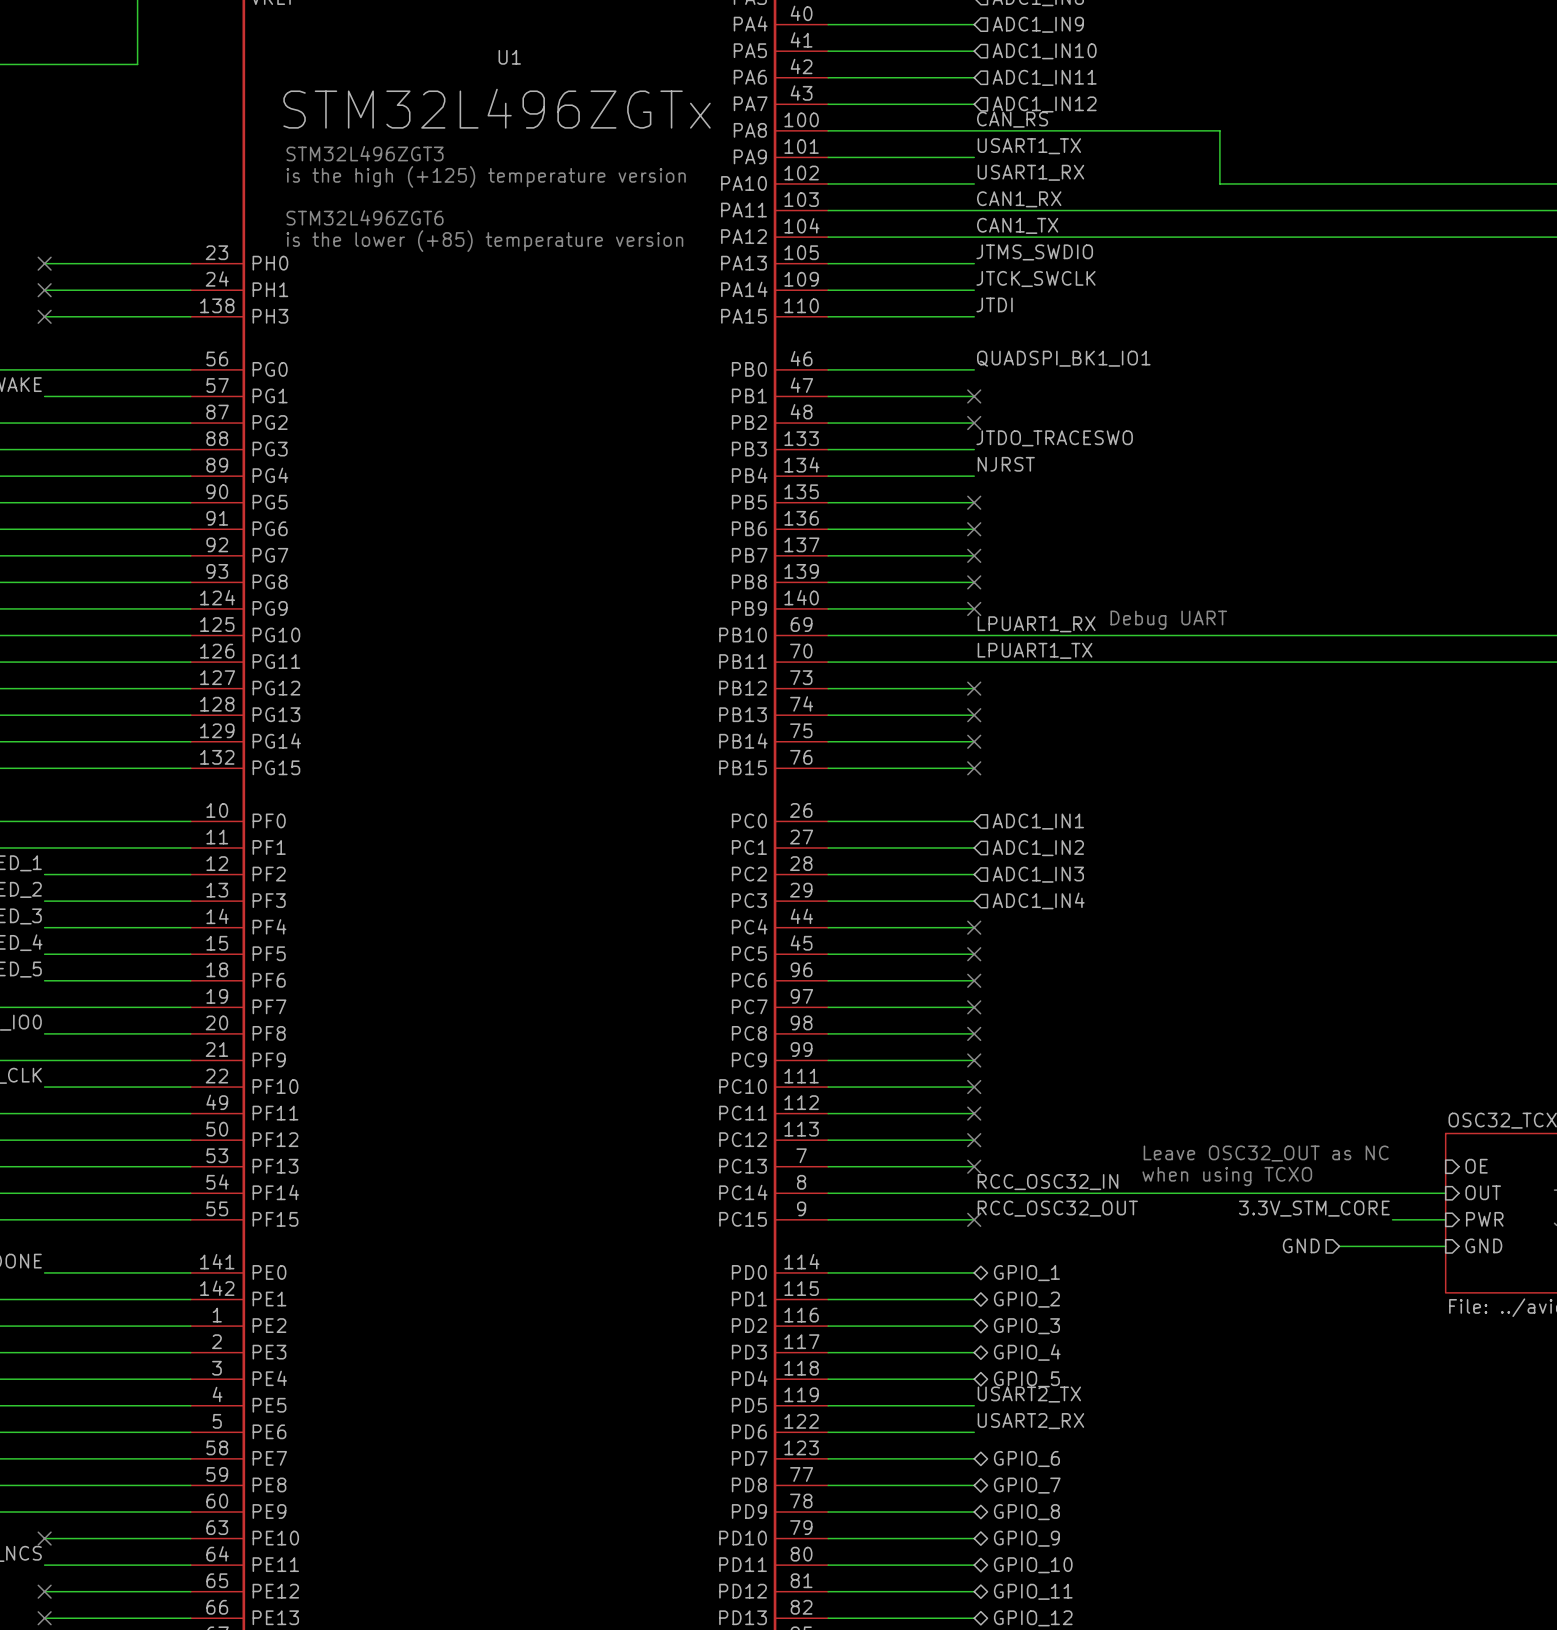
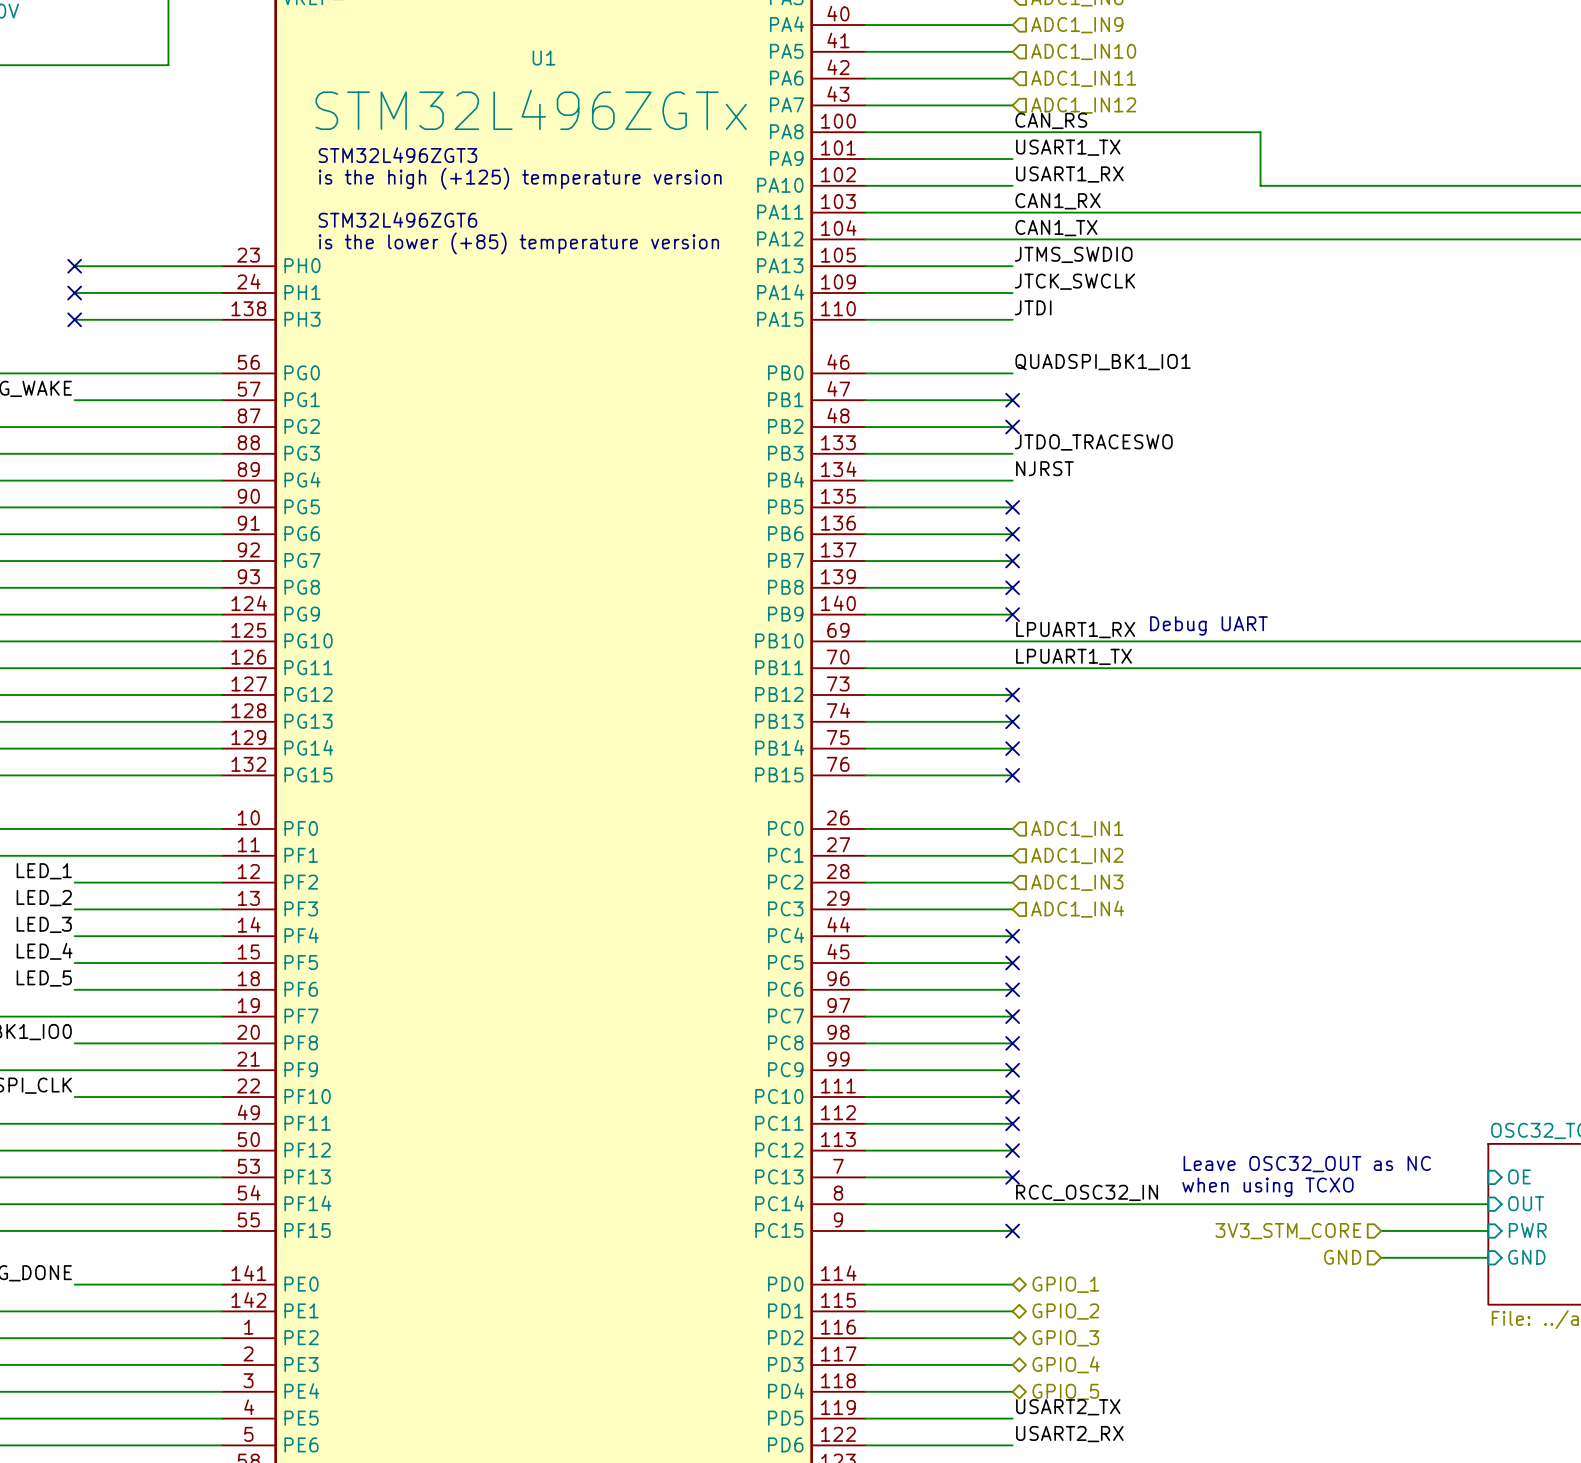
label: RCC_OSC32_OUT (1057, 1208) -> none
label: 3.3V_STM_CORE (1314, 1208) -> none
hierarchical label: none -> 3V3_STM_CORE (1288, 1231)
wire: none -> (1381, 1230) (1434, 1230)

